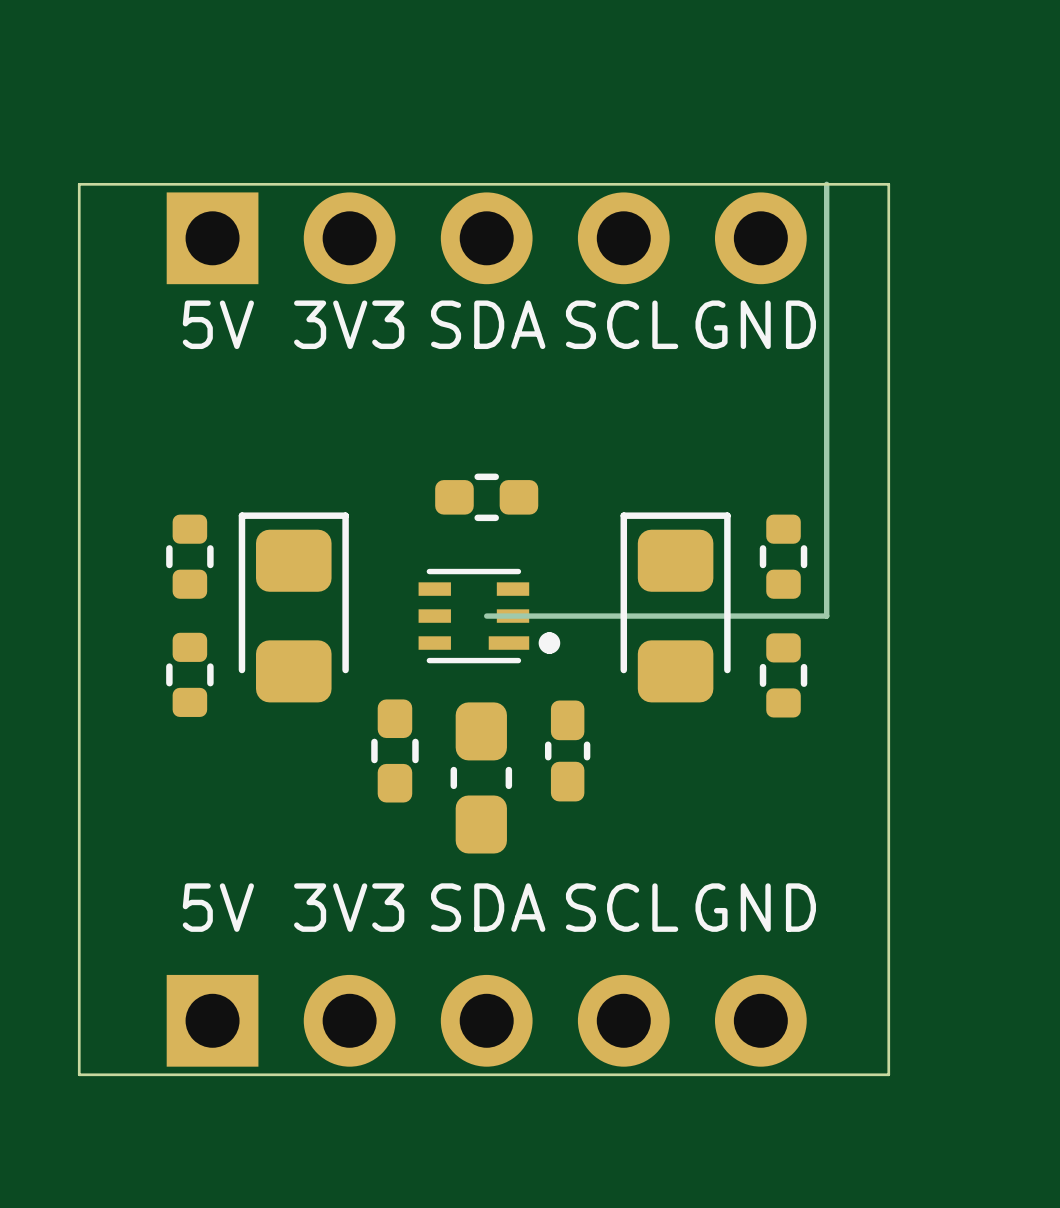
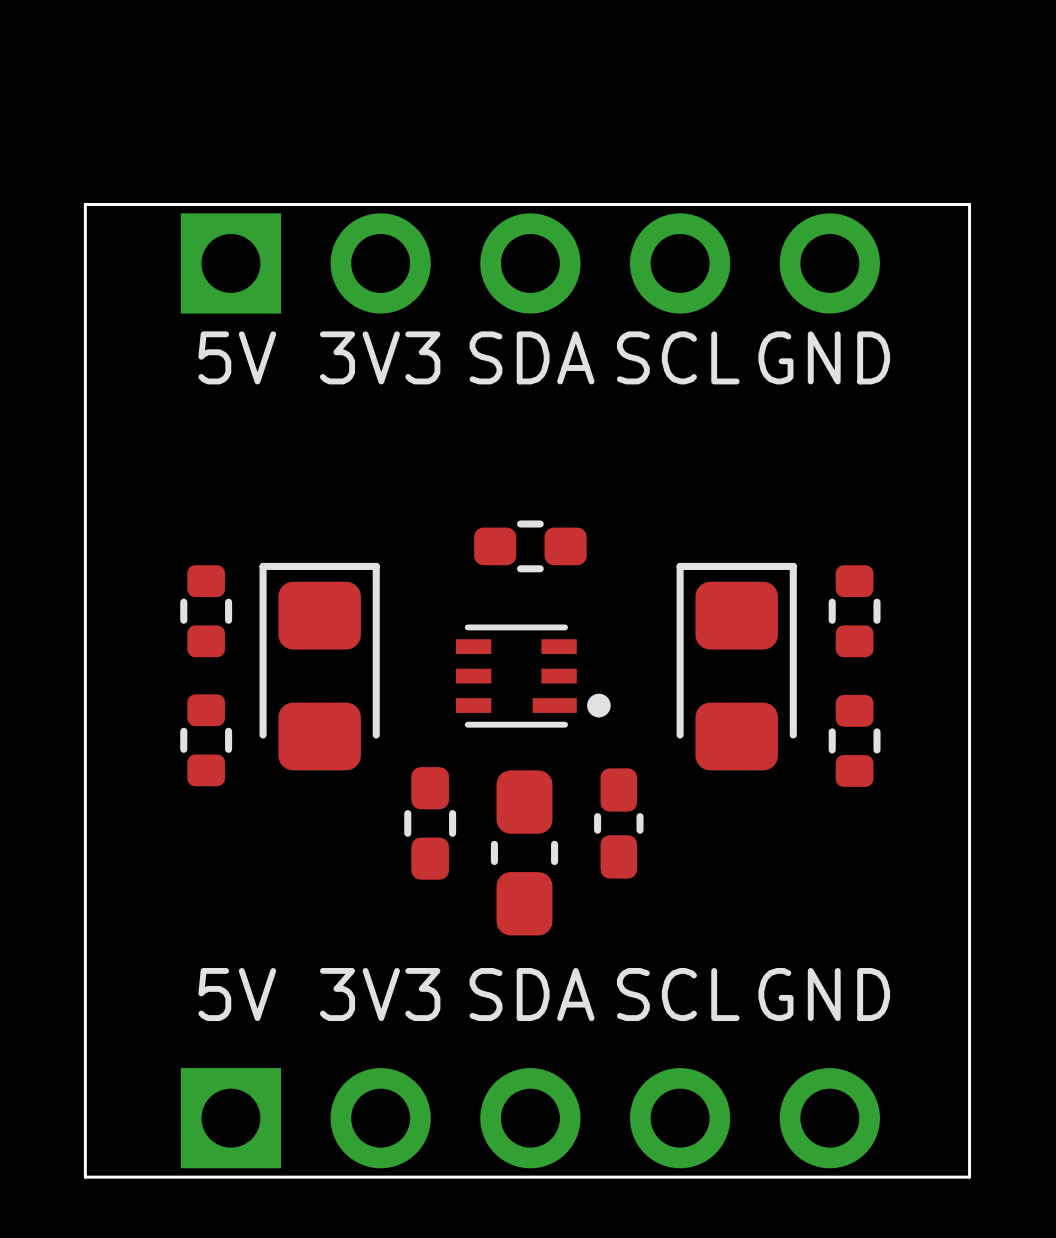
line: (826, 184) (826, 616) (486, 616) -> none

